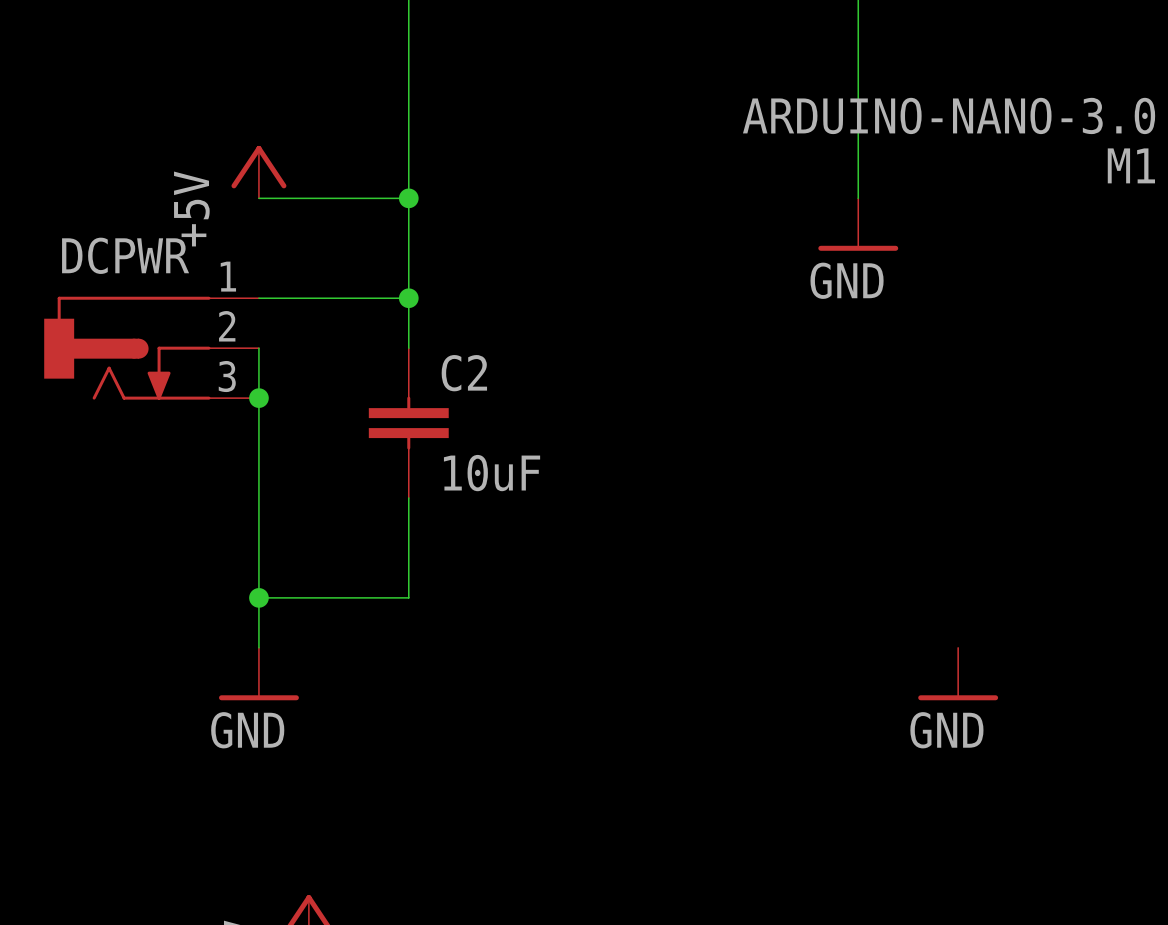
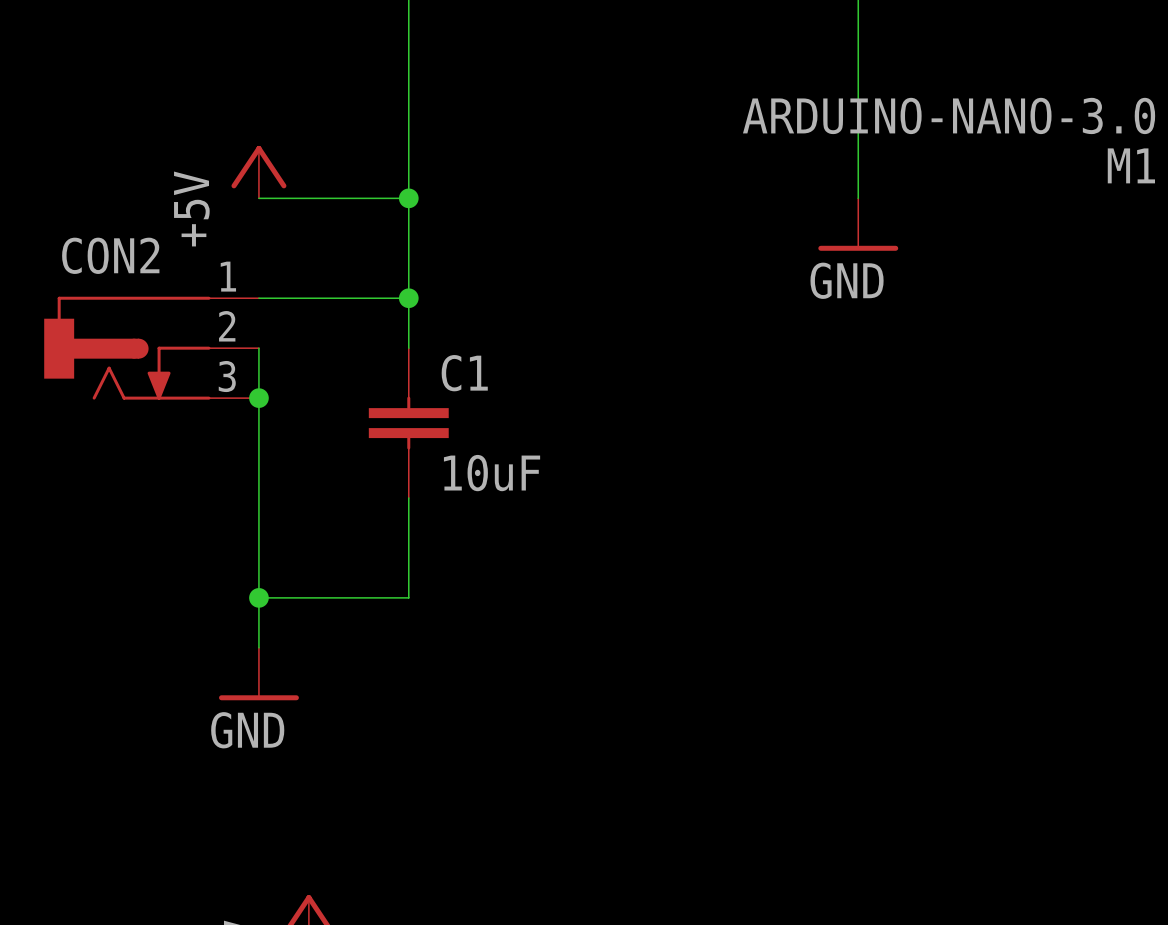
DCPWR name: DCPWR (125, 255) -> CON2 (110, 255)
C2 name: C2 (464, 373) -> C1 (464, 373)
power symbol: GND (958, 674) -> none

